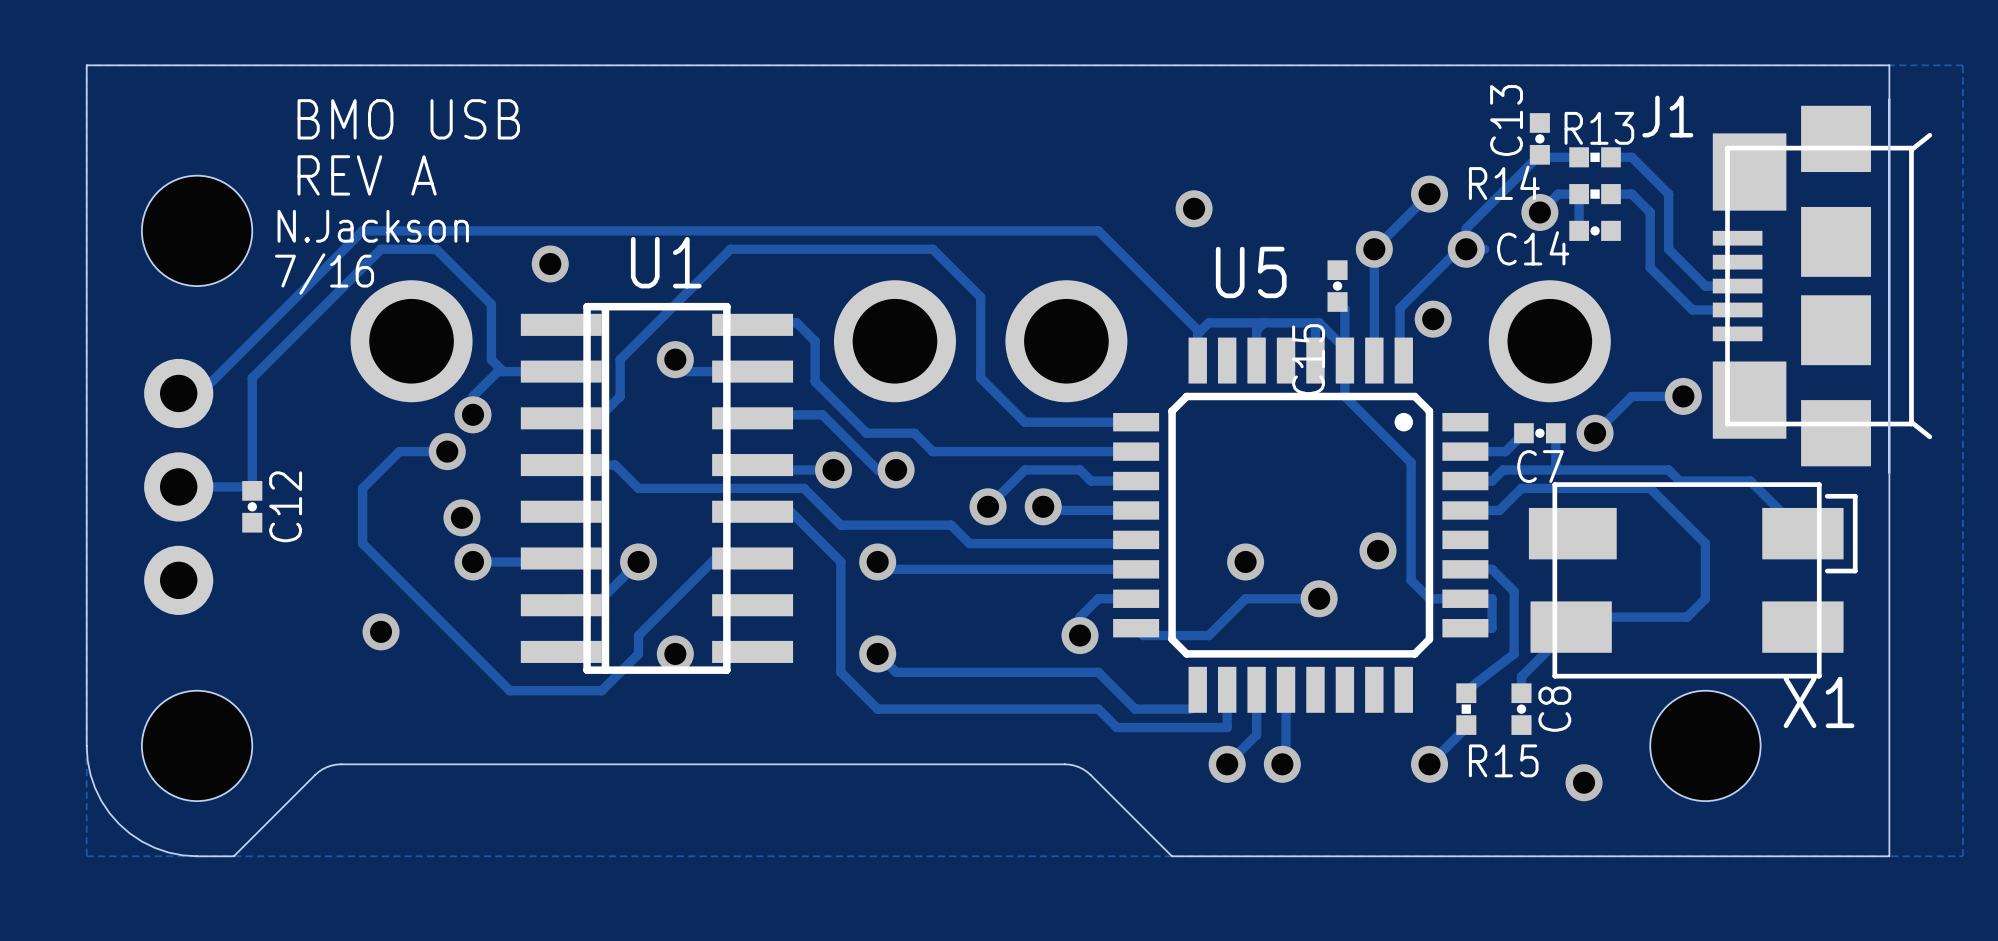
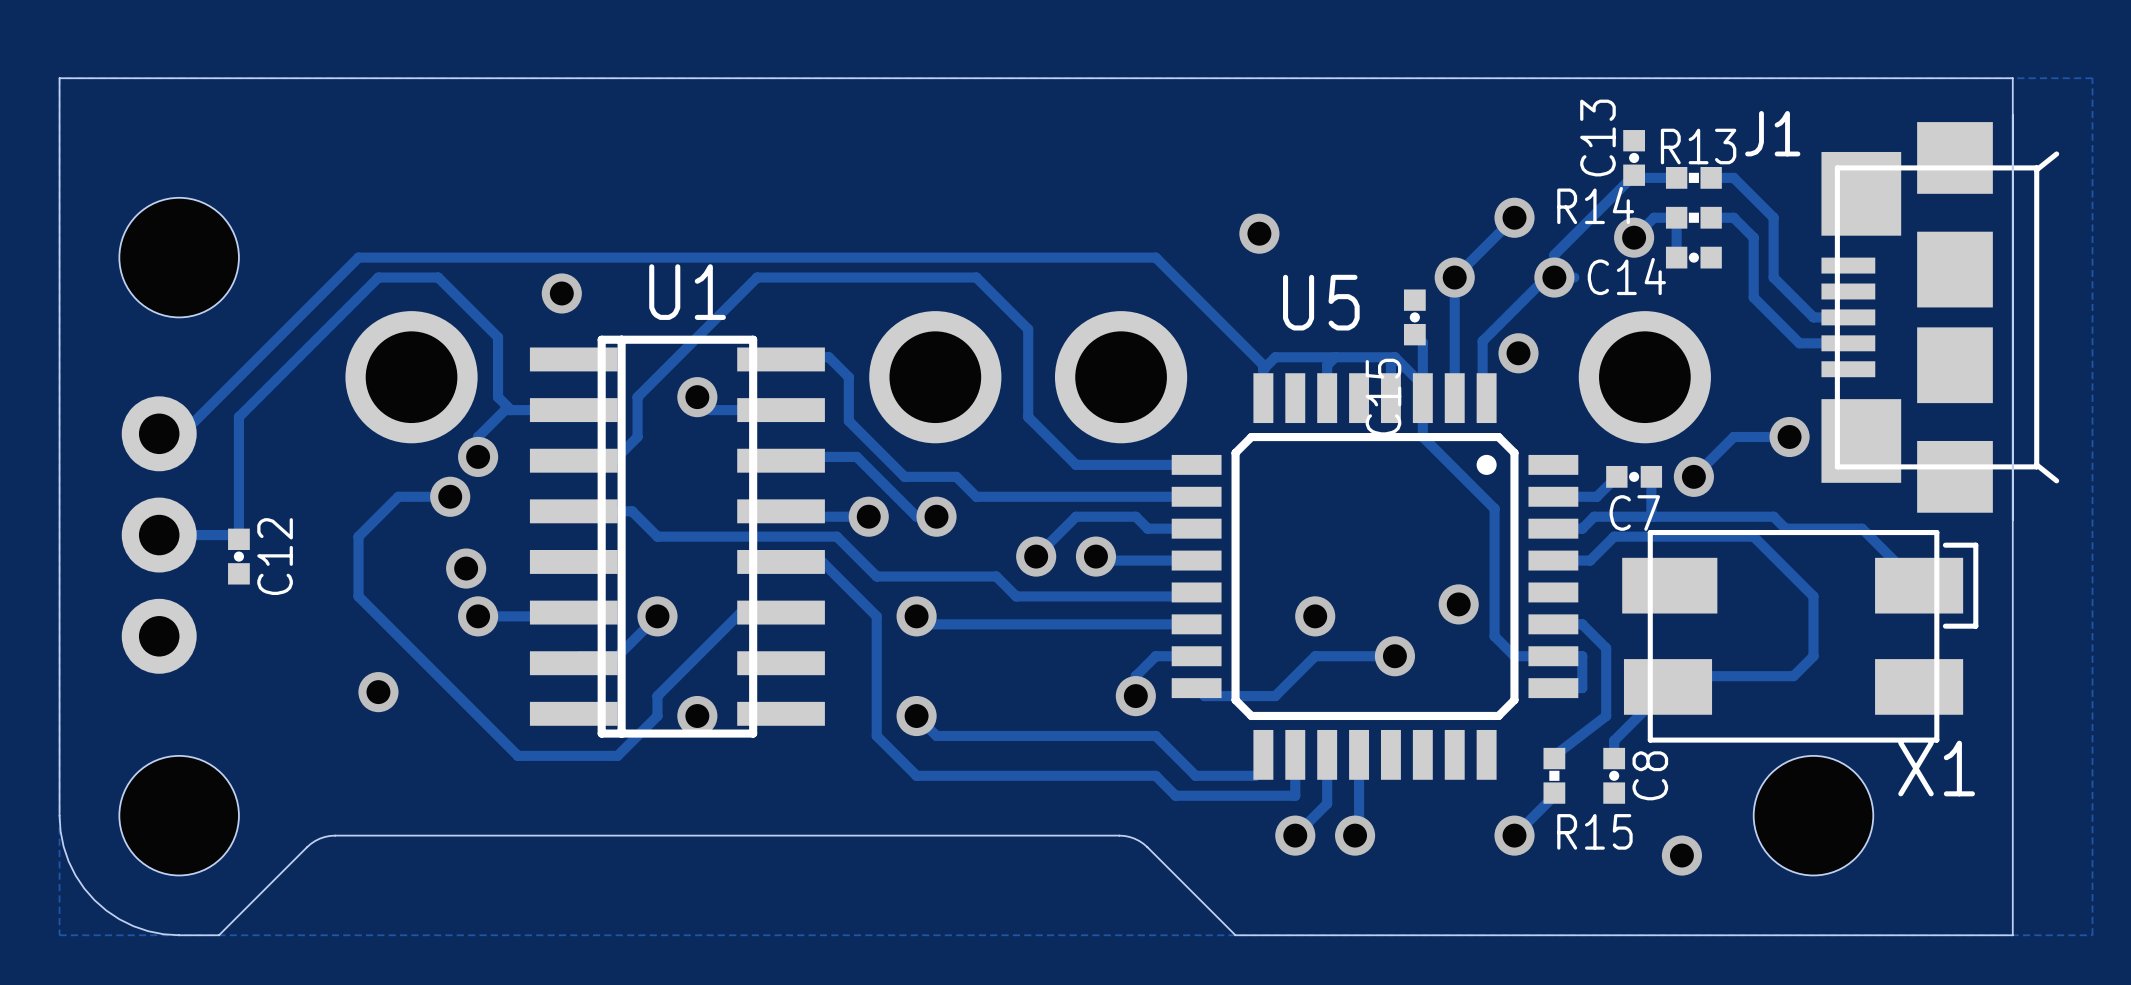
text: BMO USB (408, 119) -> none
text: REV A (367, 175) -> none
text: N.Jackson (373, 226) -> none
text: 7/16 (324, 273) -> none

